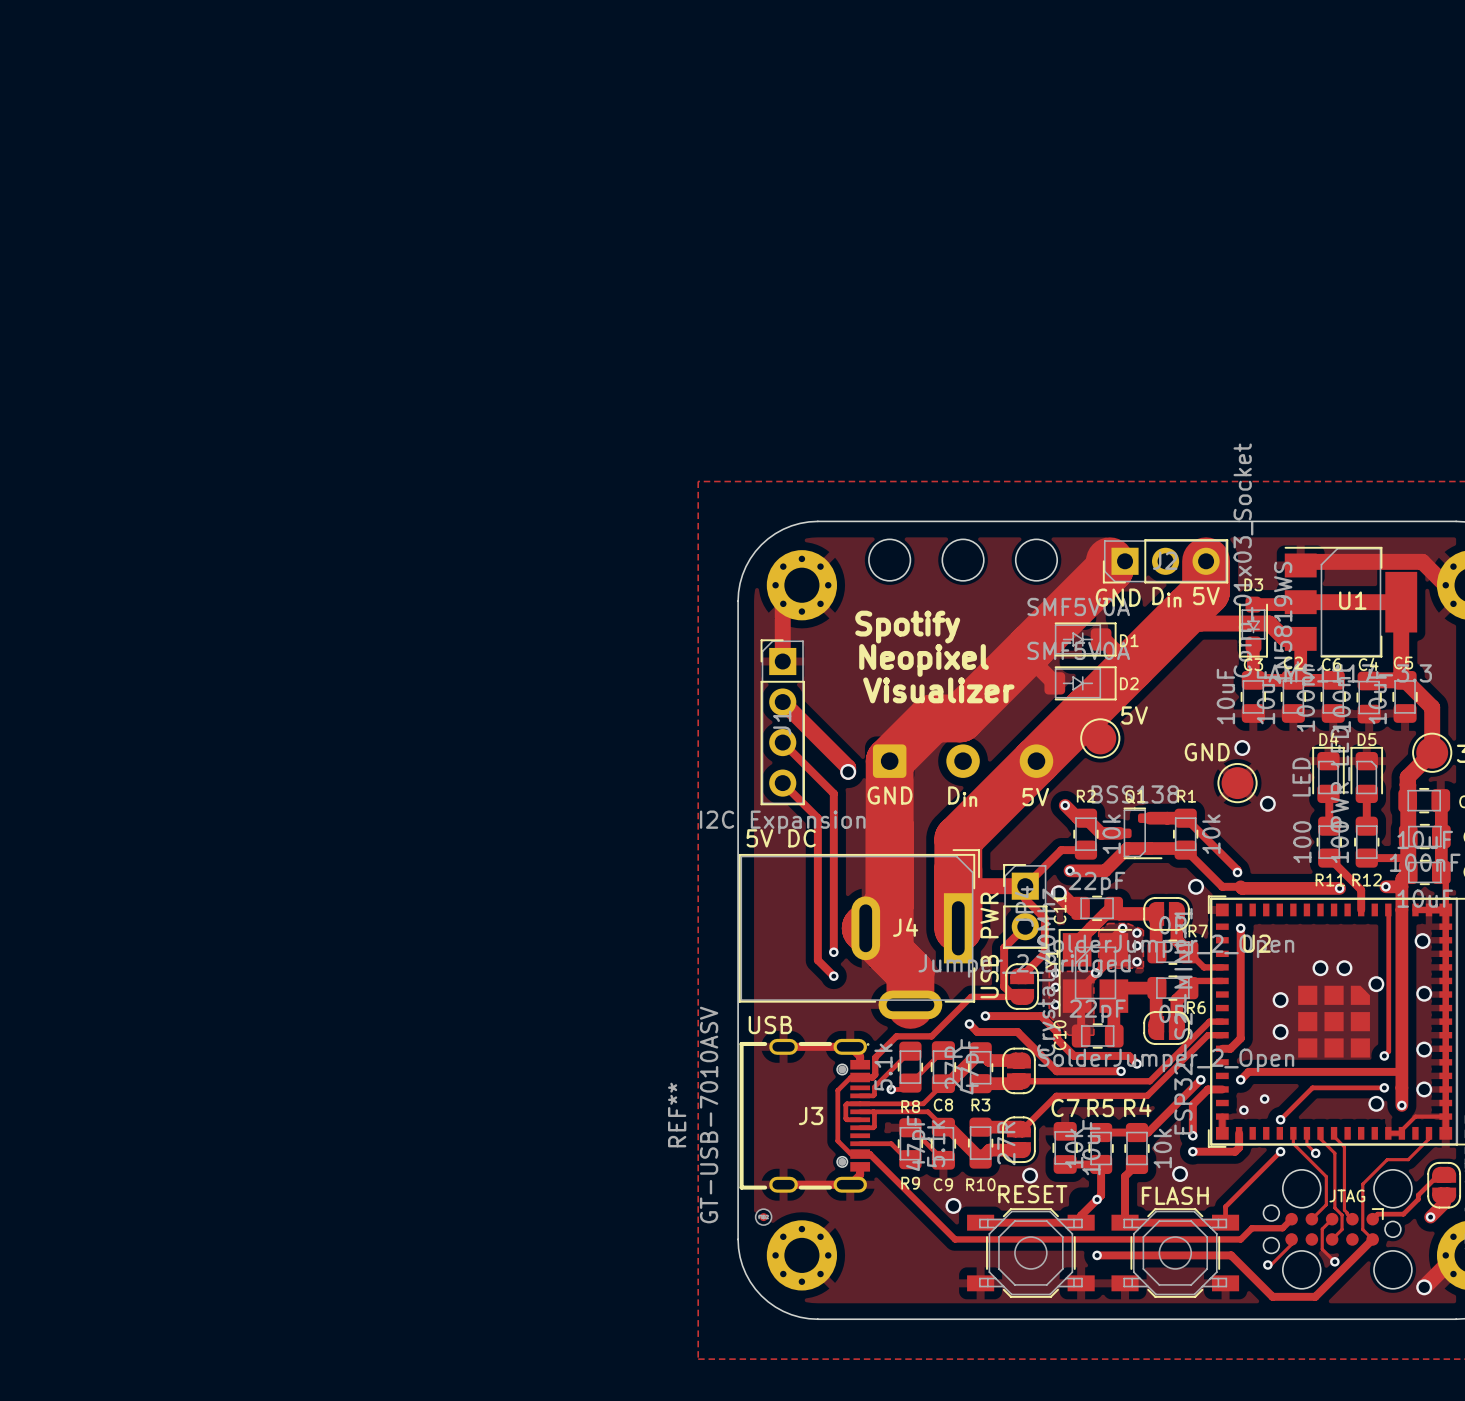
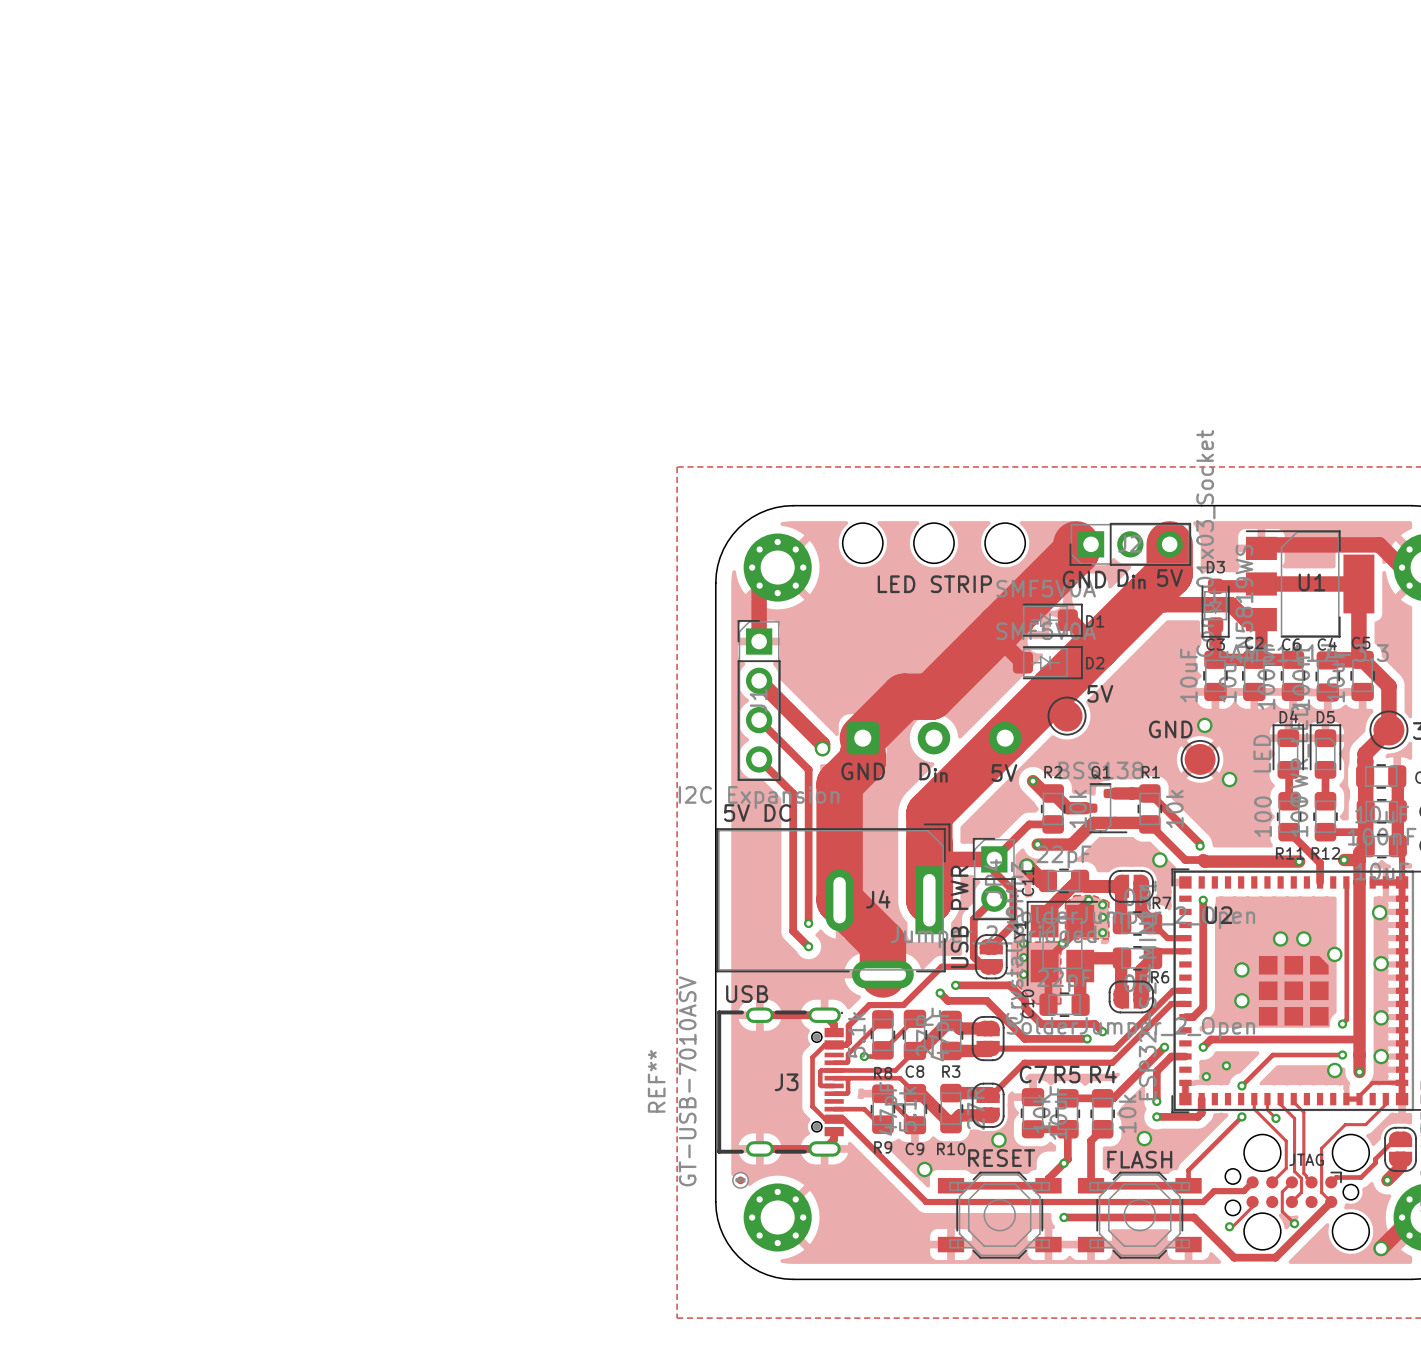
text: none -> LED STRIP (934, 584)
text: Spotify (907, 627) -> none
text: Neopixel (924, 660) -> none
text: Visualizer (938, 690) -> none
track: (889, 784) (889, 952) -> (862, 760) (839, 784) (839, 900)

